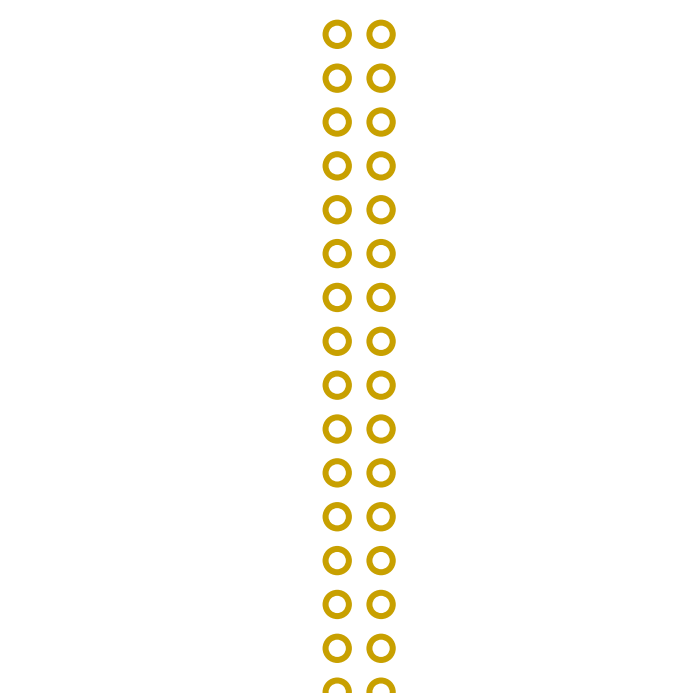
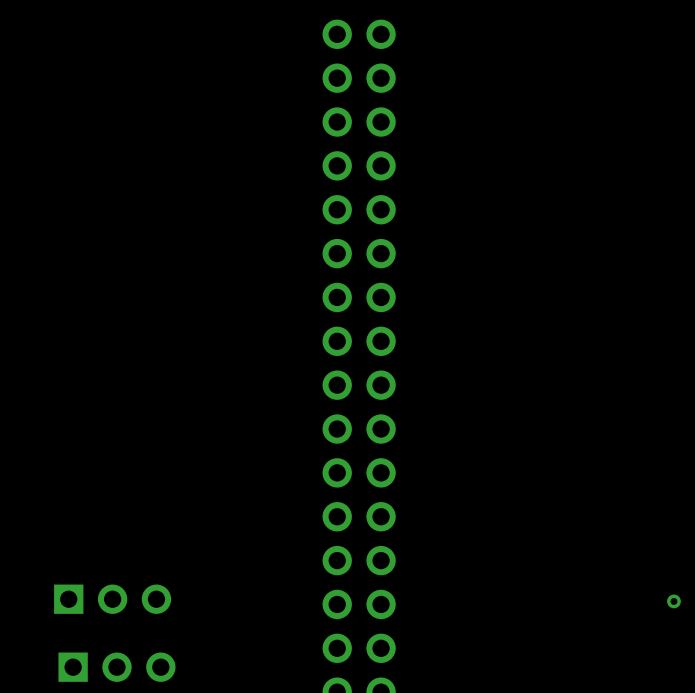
part: none -> (112, 599)
via: none -> (673, 601)
part: none -> (116, 667)

